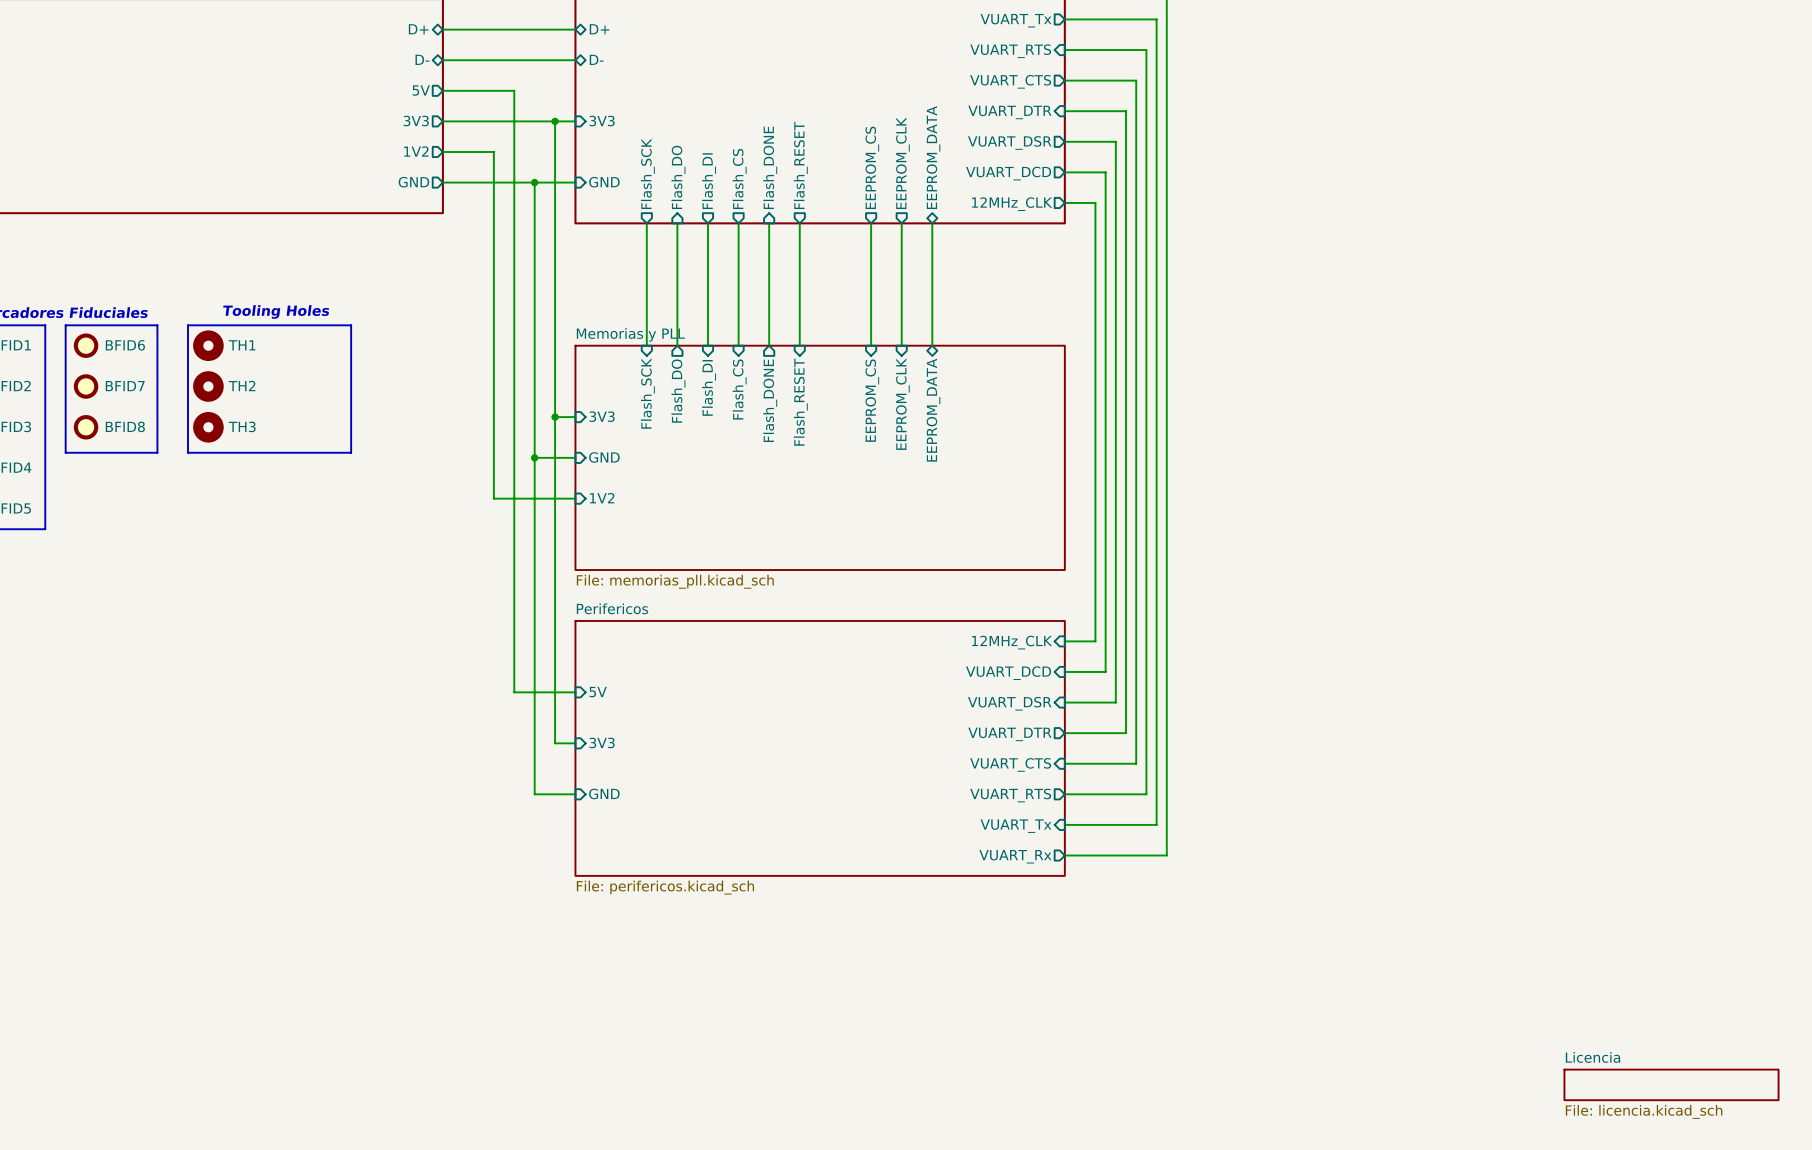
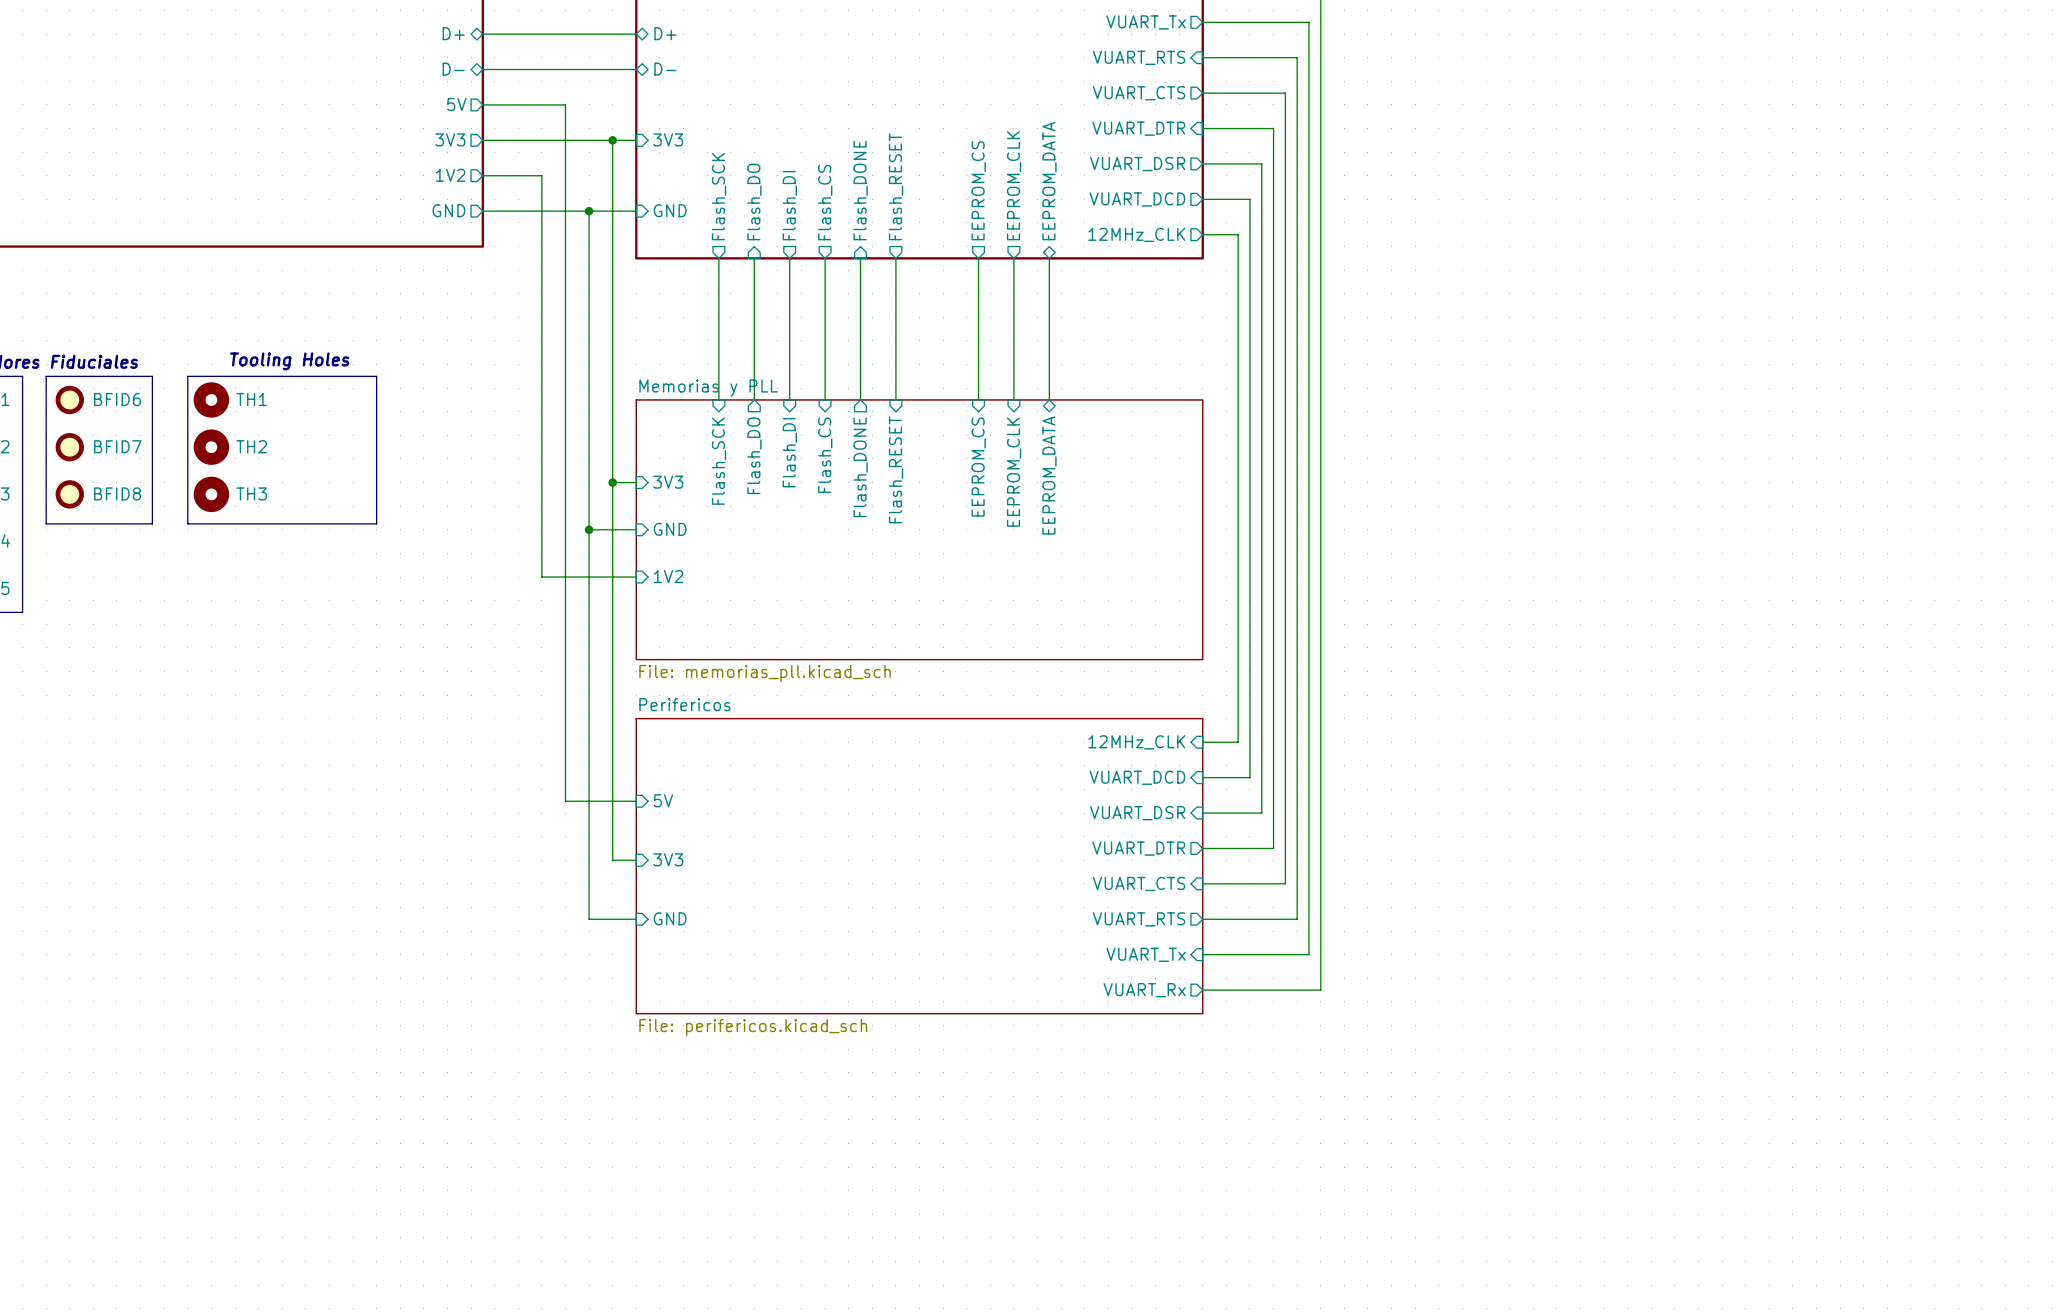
sheet Licencia: File: licencia.kicad_sch (1671, 1084) -> none

